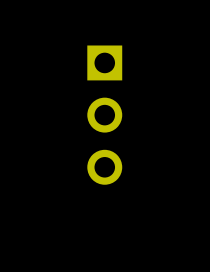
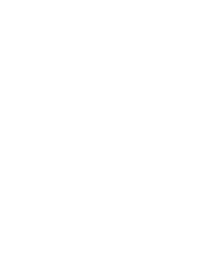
part: (104, 115) -> none

